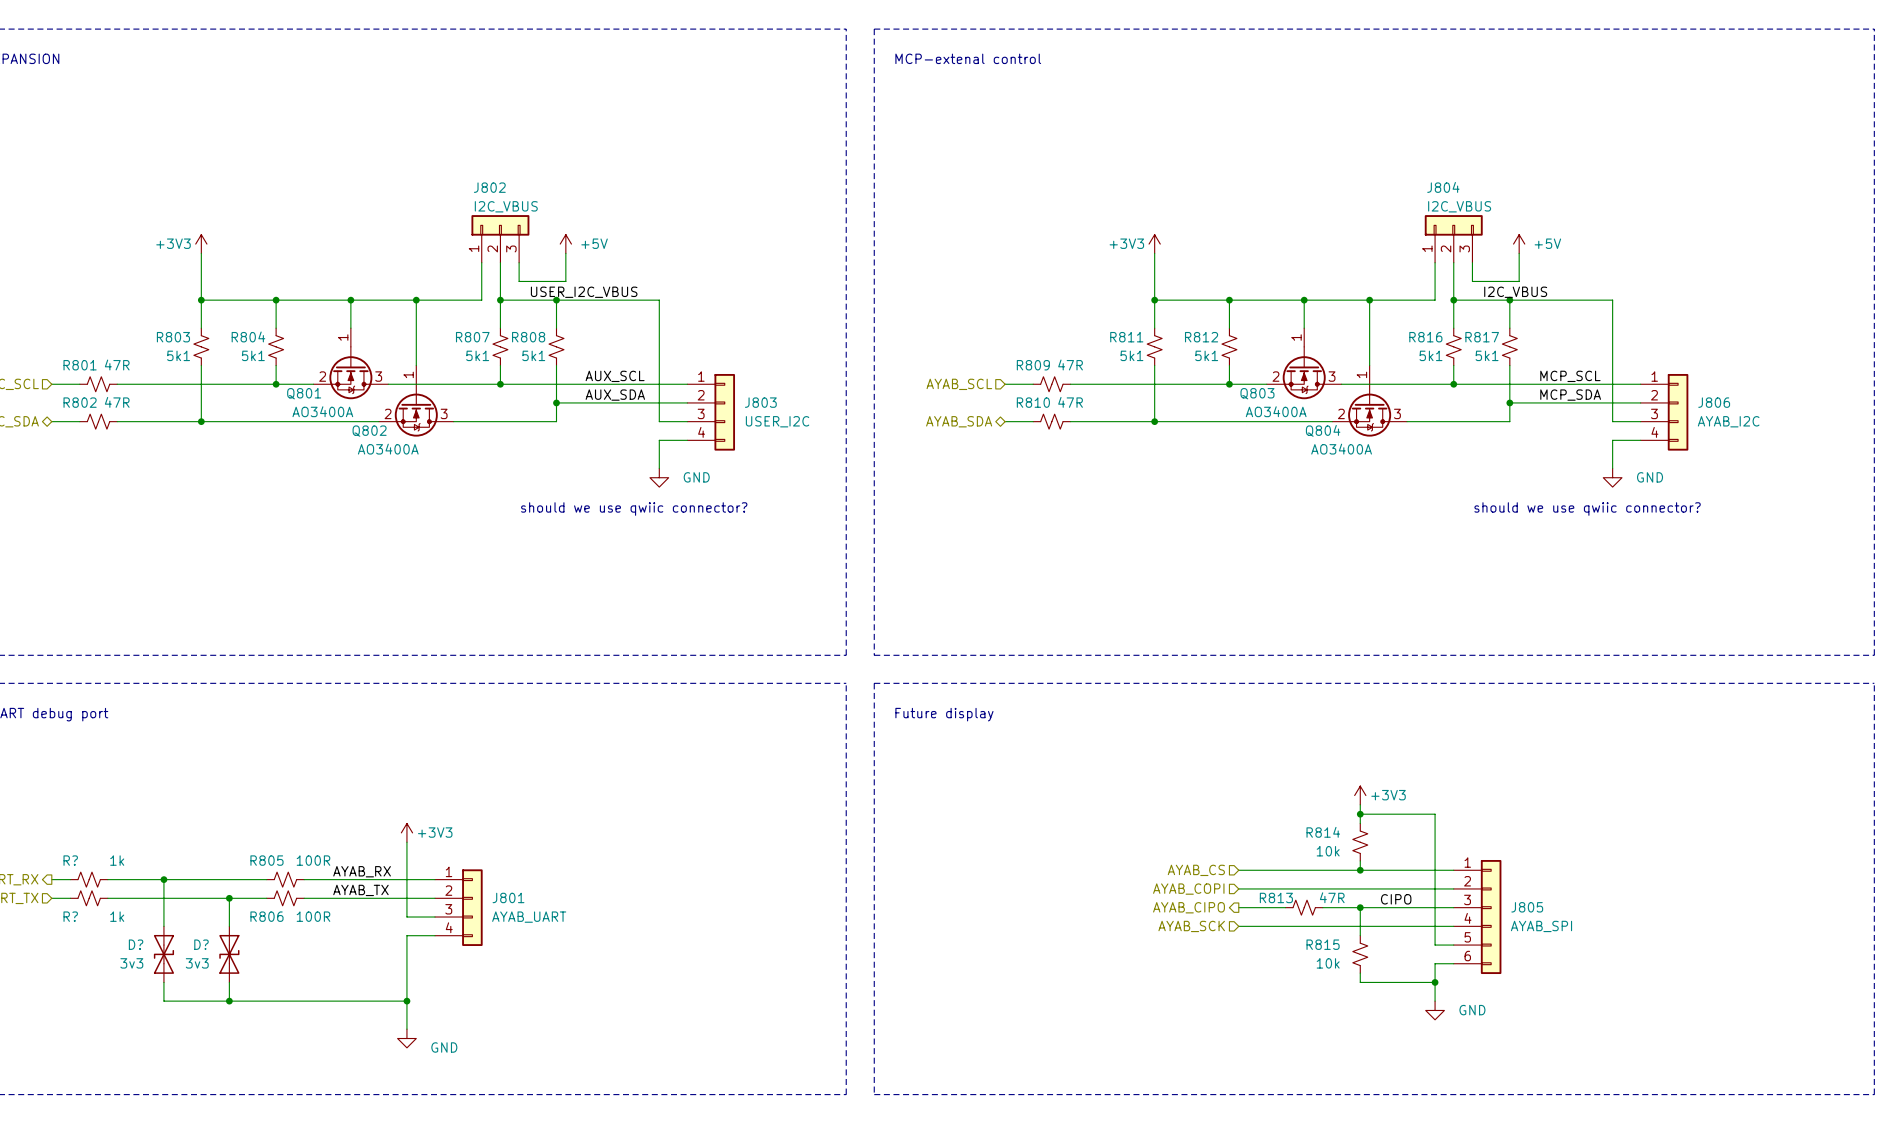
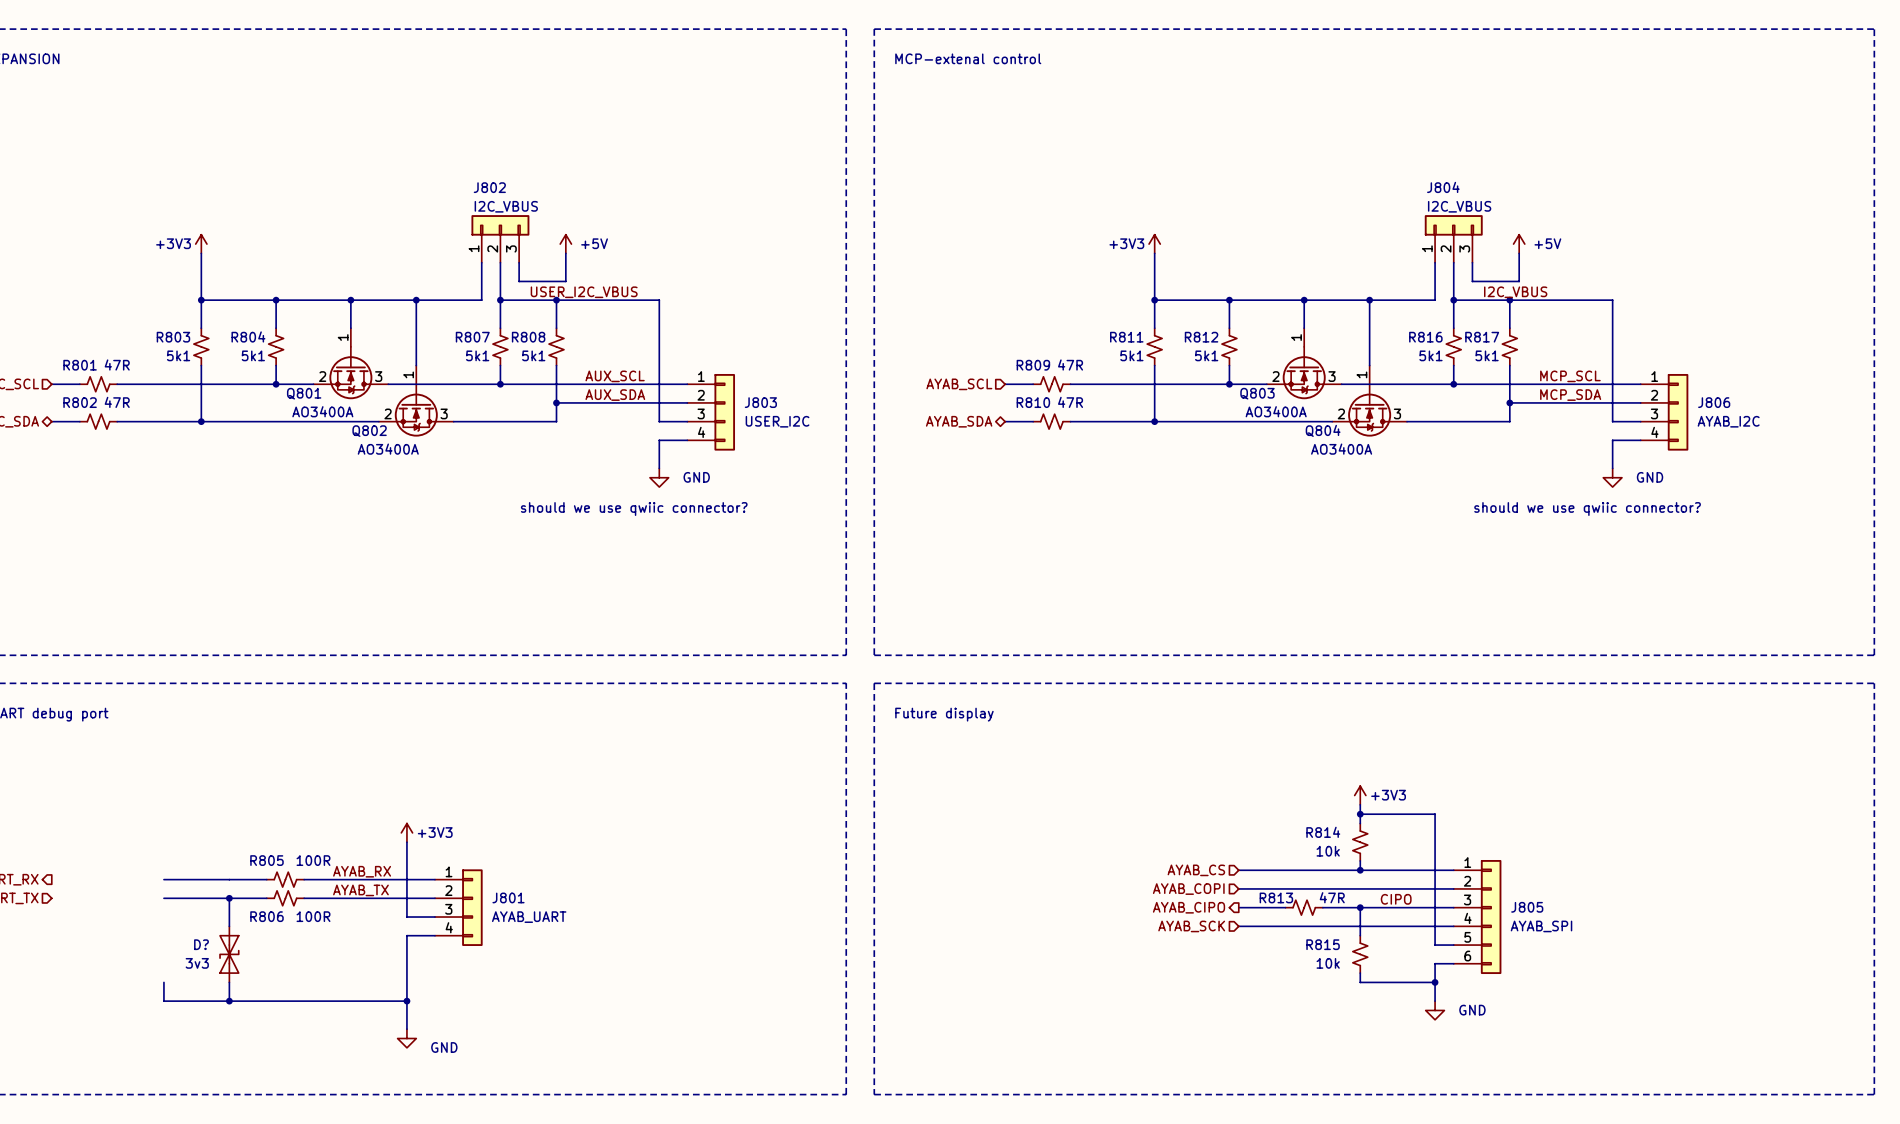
wire: (51, 879) (70, 879) -> none
R?: 1k (89, 879) -> none
wire: (107, 879) (163, 879) (163, 926) -> none
junction: (163, 879) -> none
wire: (51, 898) (70, 898) -> none
R?: 1k (89, 898) -> none
wire: (107, 898) (163, 898) -> none
D?: 3v3 (163, 954) -> none

